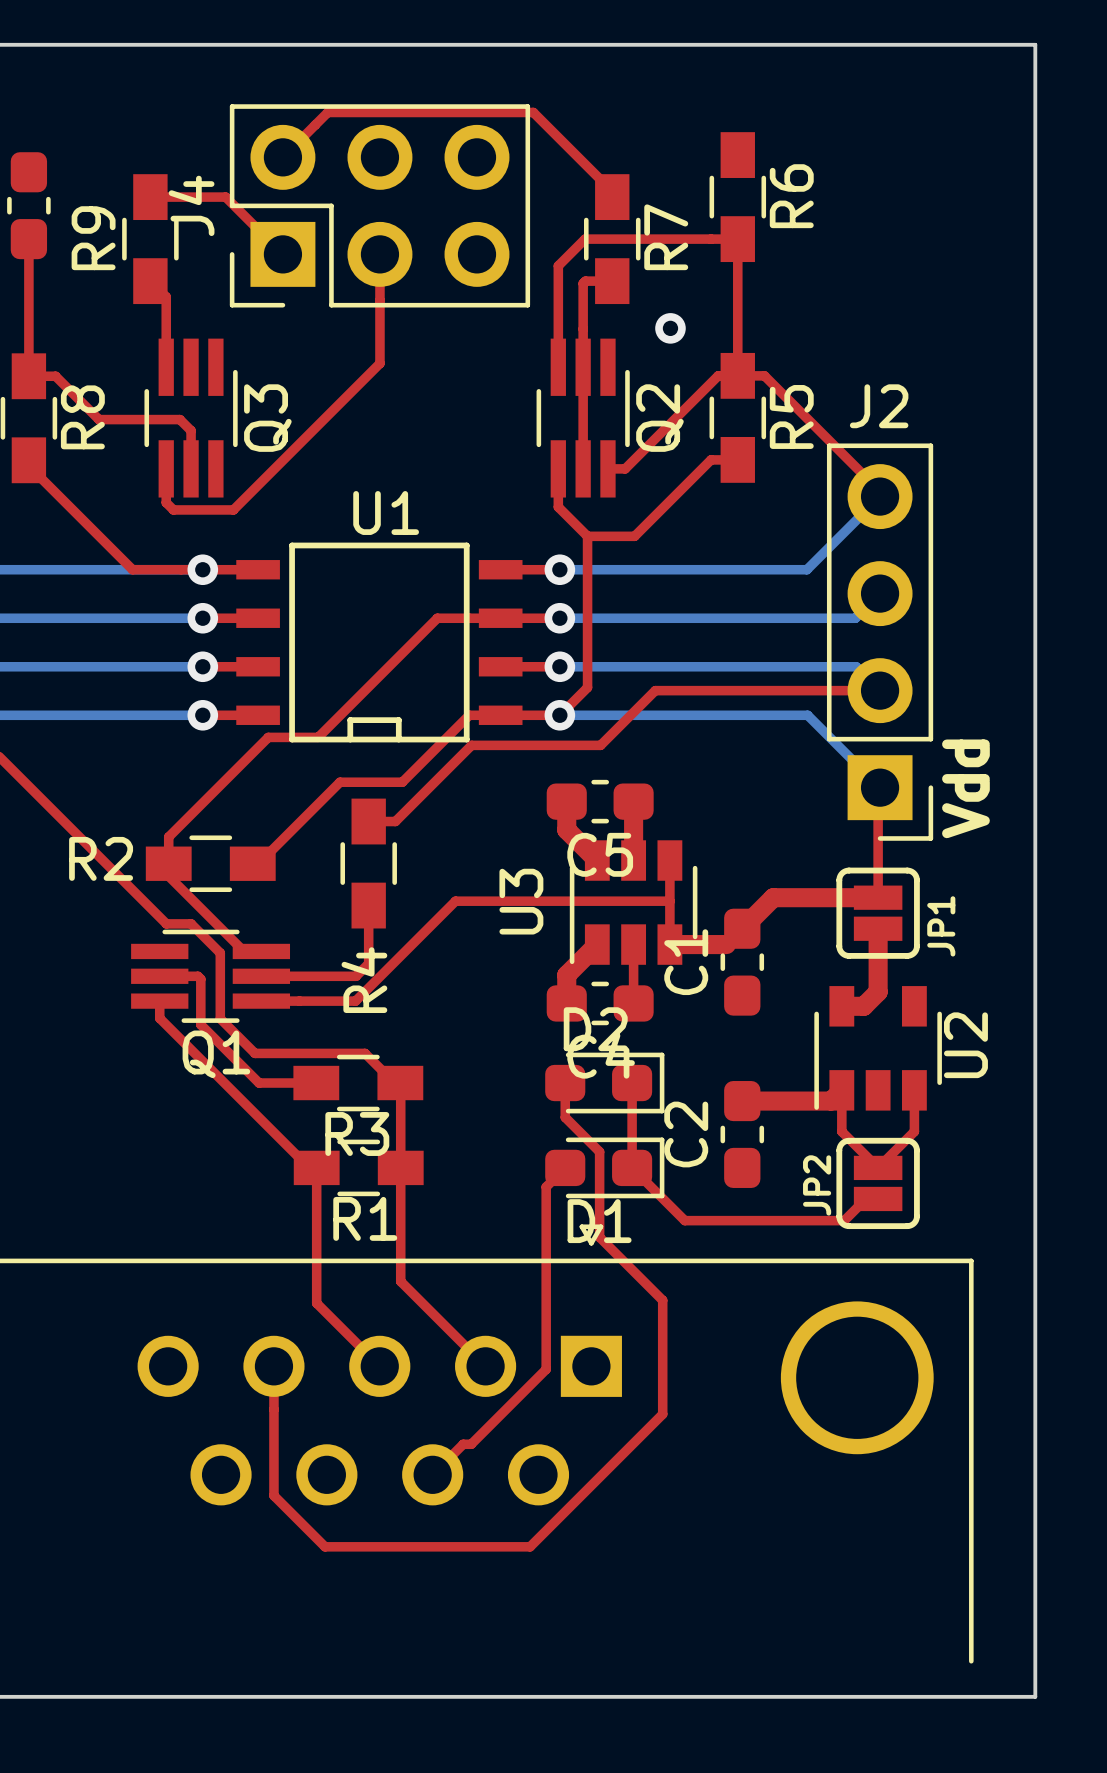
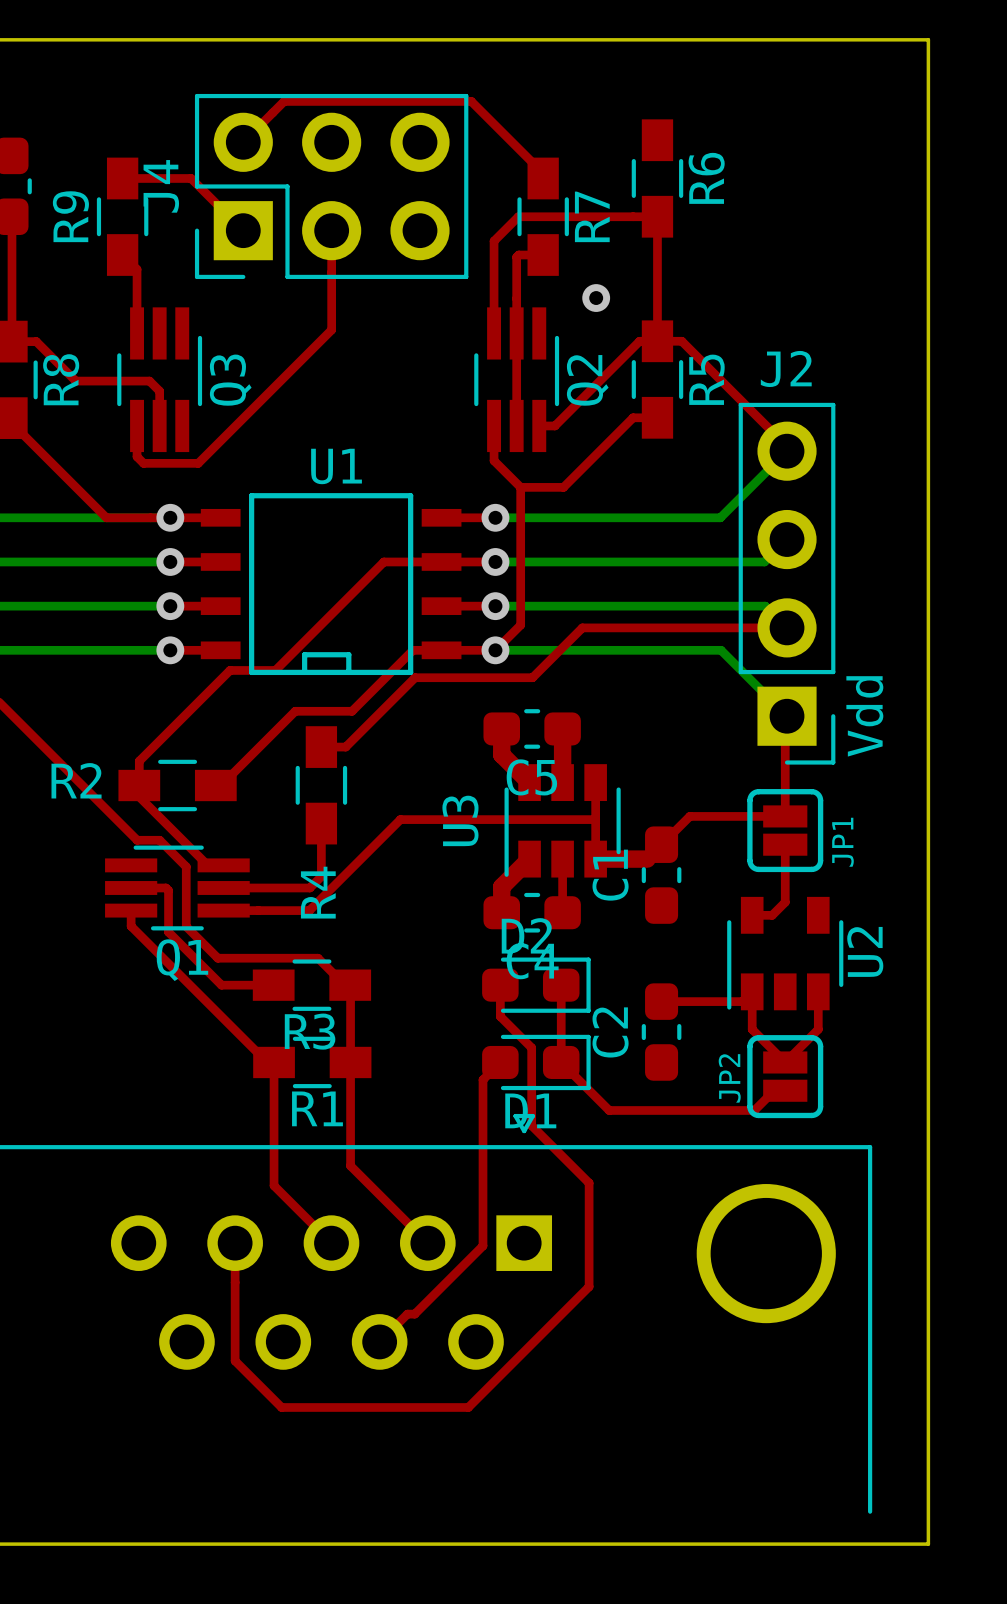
top track width: thick (878, 897) (773, 897) (742, 928) -> thin (785, 816) (689, 816) (661, 844)
top track width: thick (878, 928) (878, 991) (863, 1006) (841, 1006) -> thin (785, 844) (785, 902) (772, 915) (752, 915)
top track width: thick (841, 1090) (831, 1101) (742, 1101) -> thin (752, 991) (742, 1001) (661, 1001)

